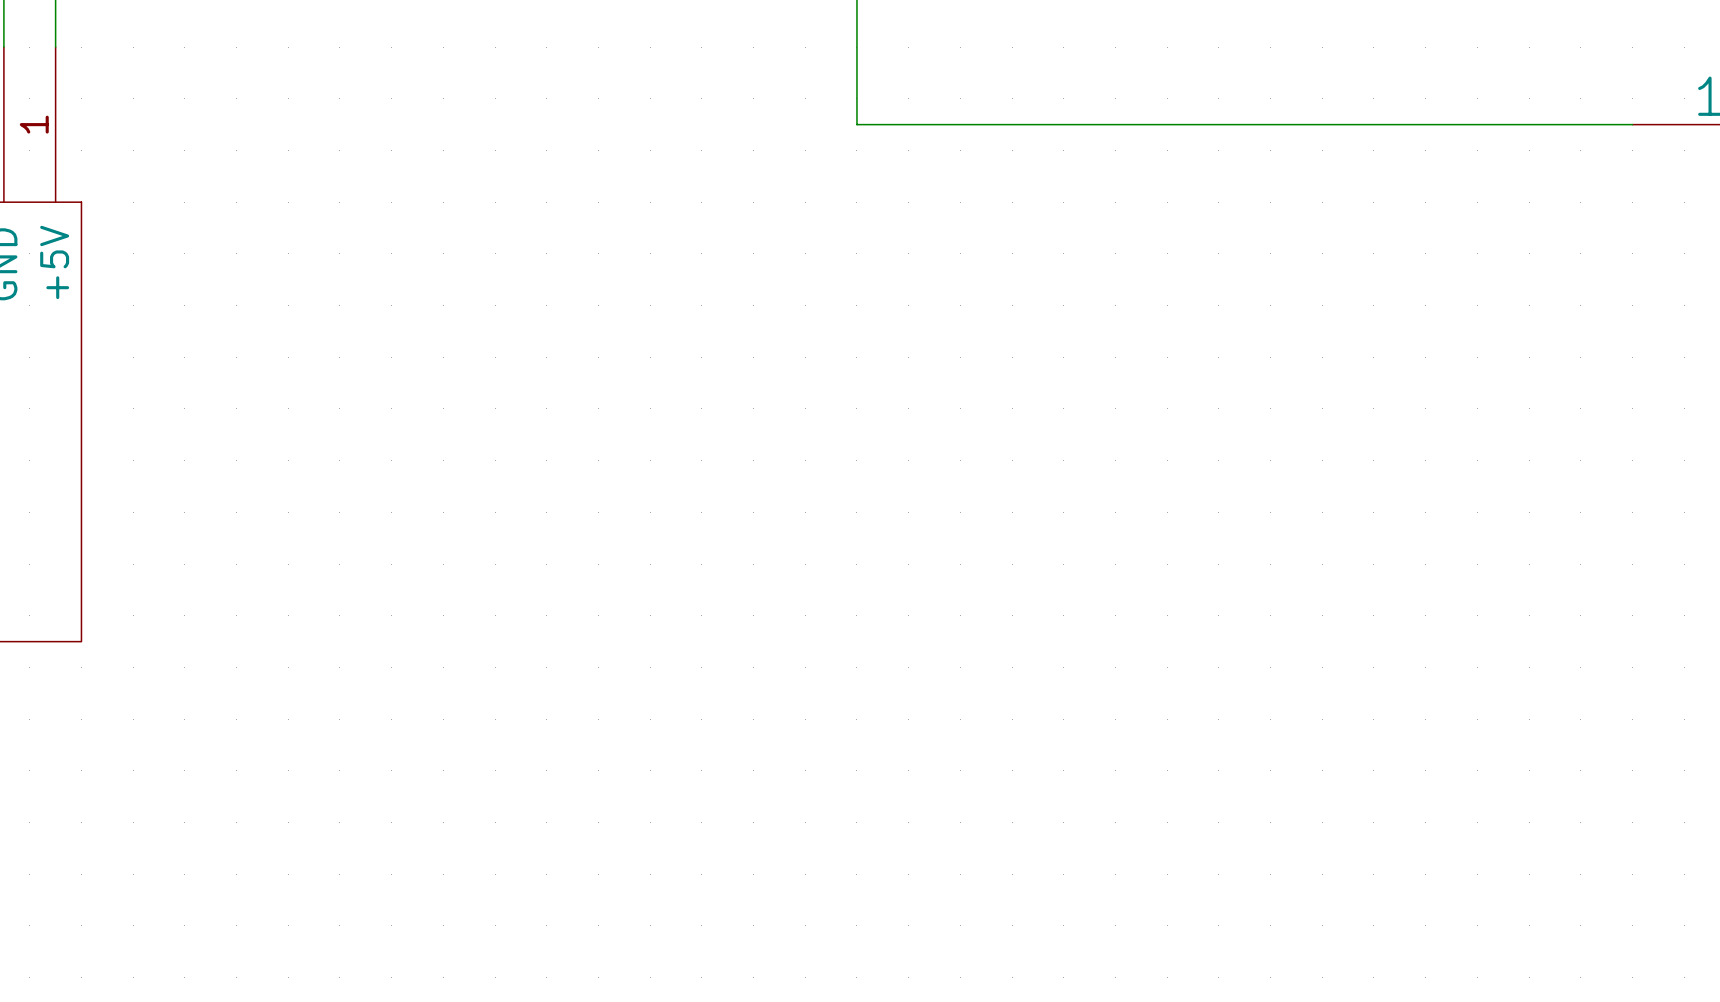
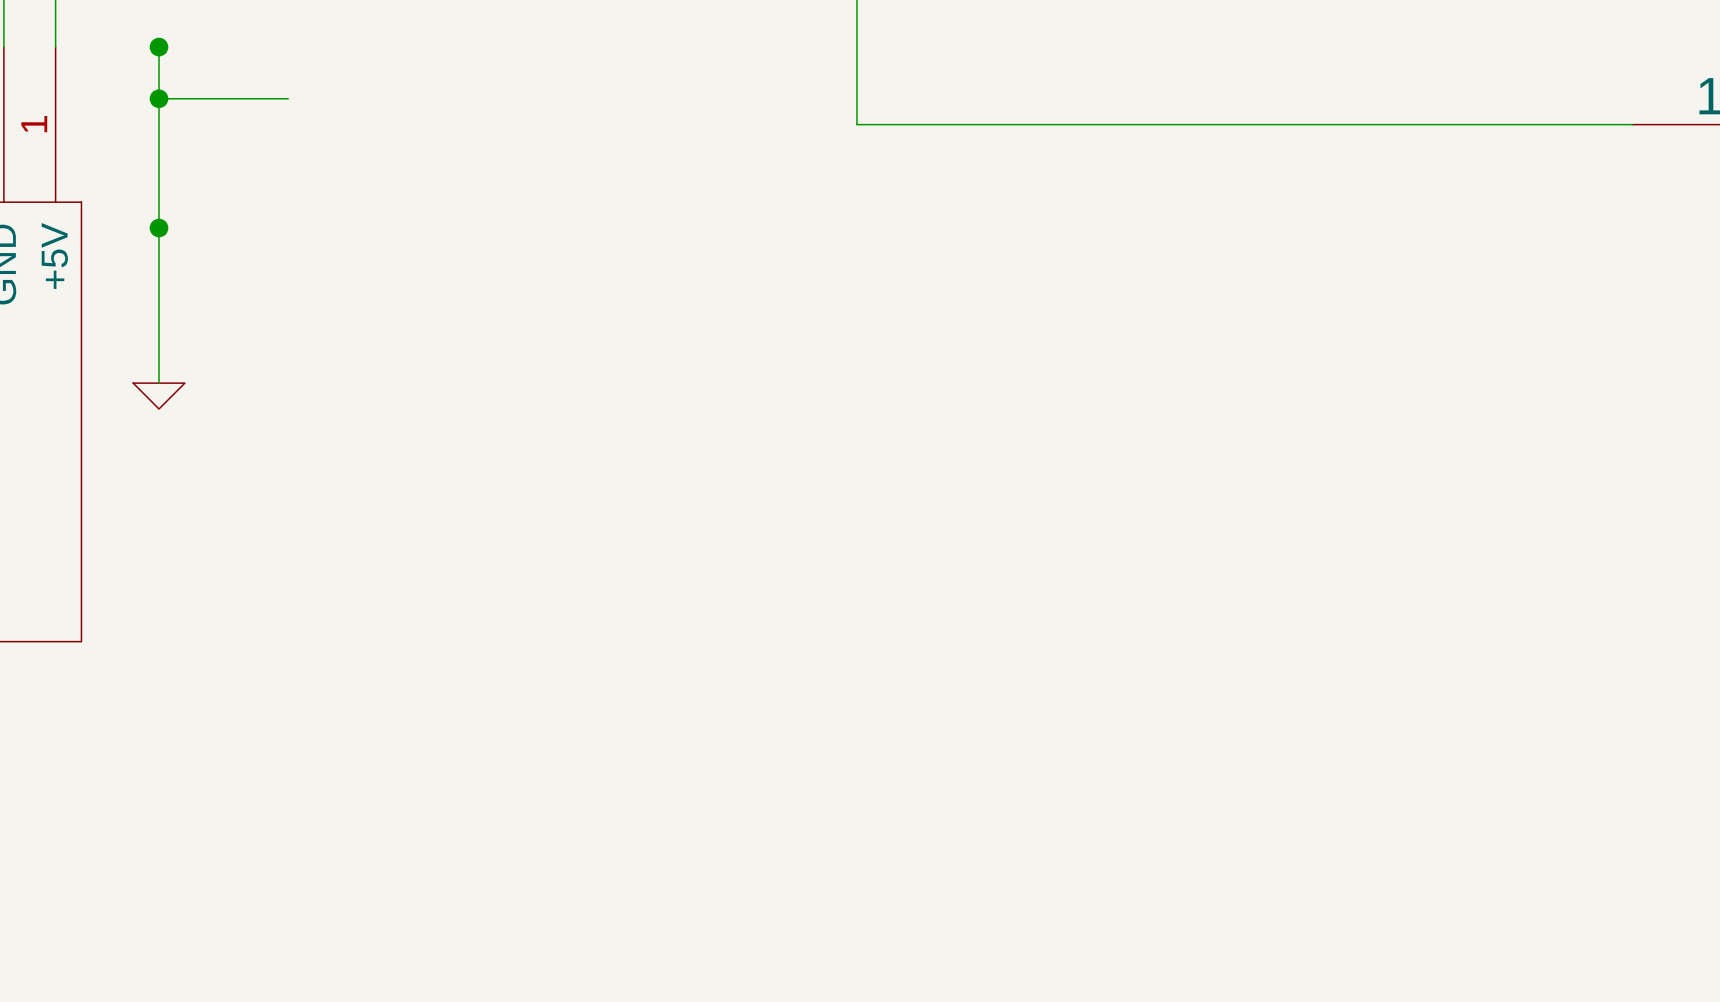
wire: none -> (159, 47) (159, 383)
junction: none -> (159, 47)
wire: none -> (159, 98) (288, 98)
junction: none -> (159, 98)
junction: none -> (159, 228)
power symbol: none -> (159, 396)

